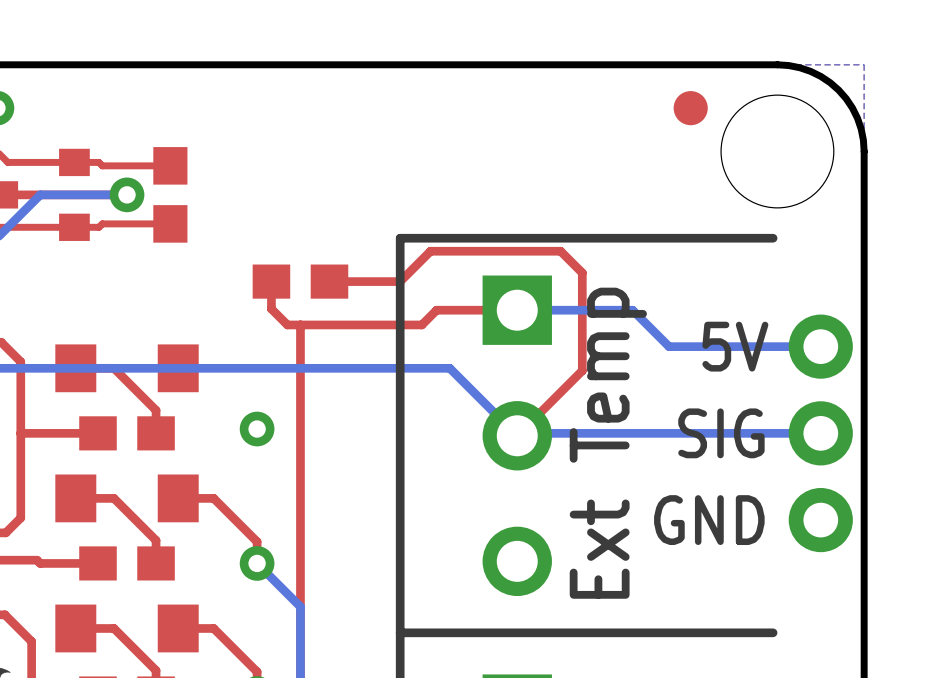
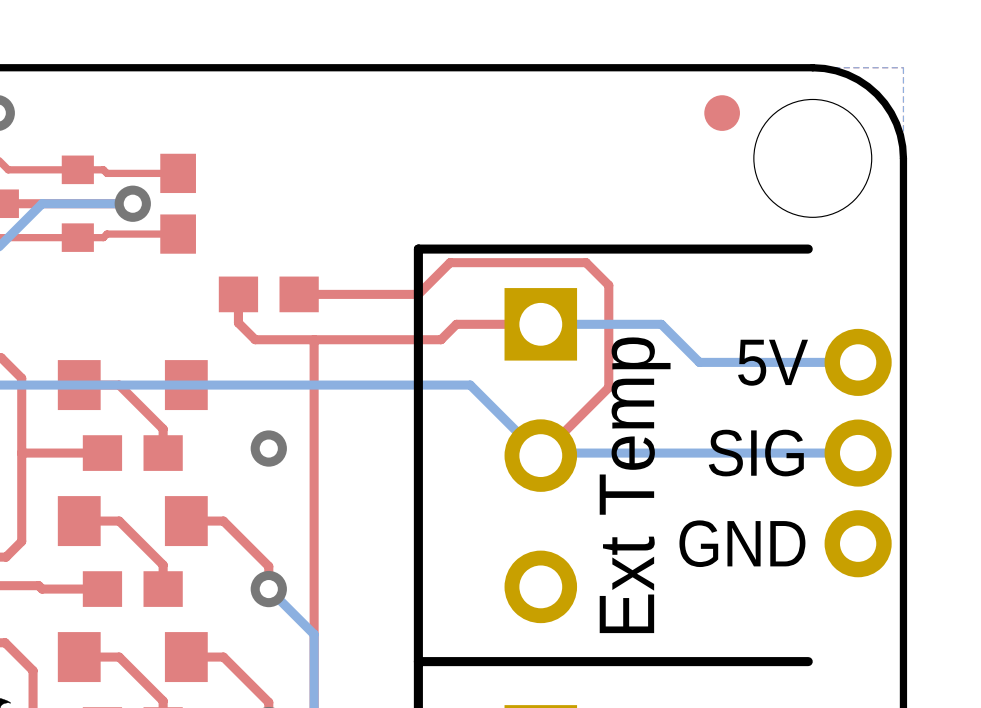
top track: (271, 281) (271, 308) (287, 324) -> (238, 294) (238, 322) (255, 339) (300, 339)
part position: (300, 281) -> (268, 294)
top track: none -> (344, 294) (299, 294)

